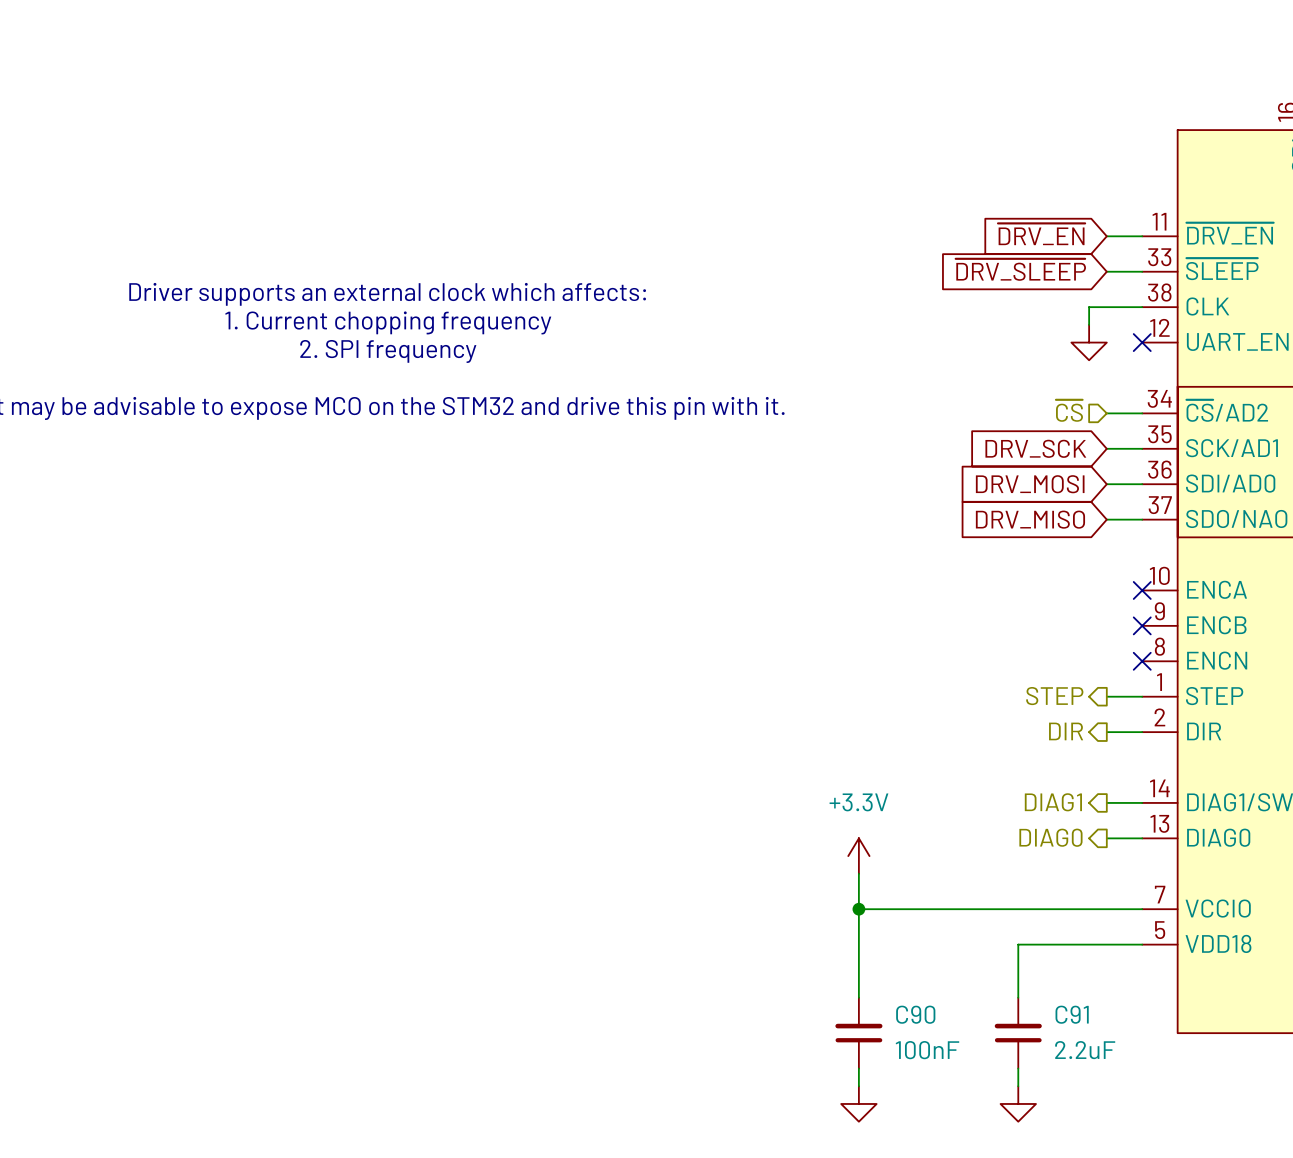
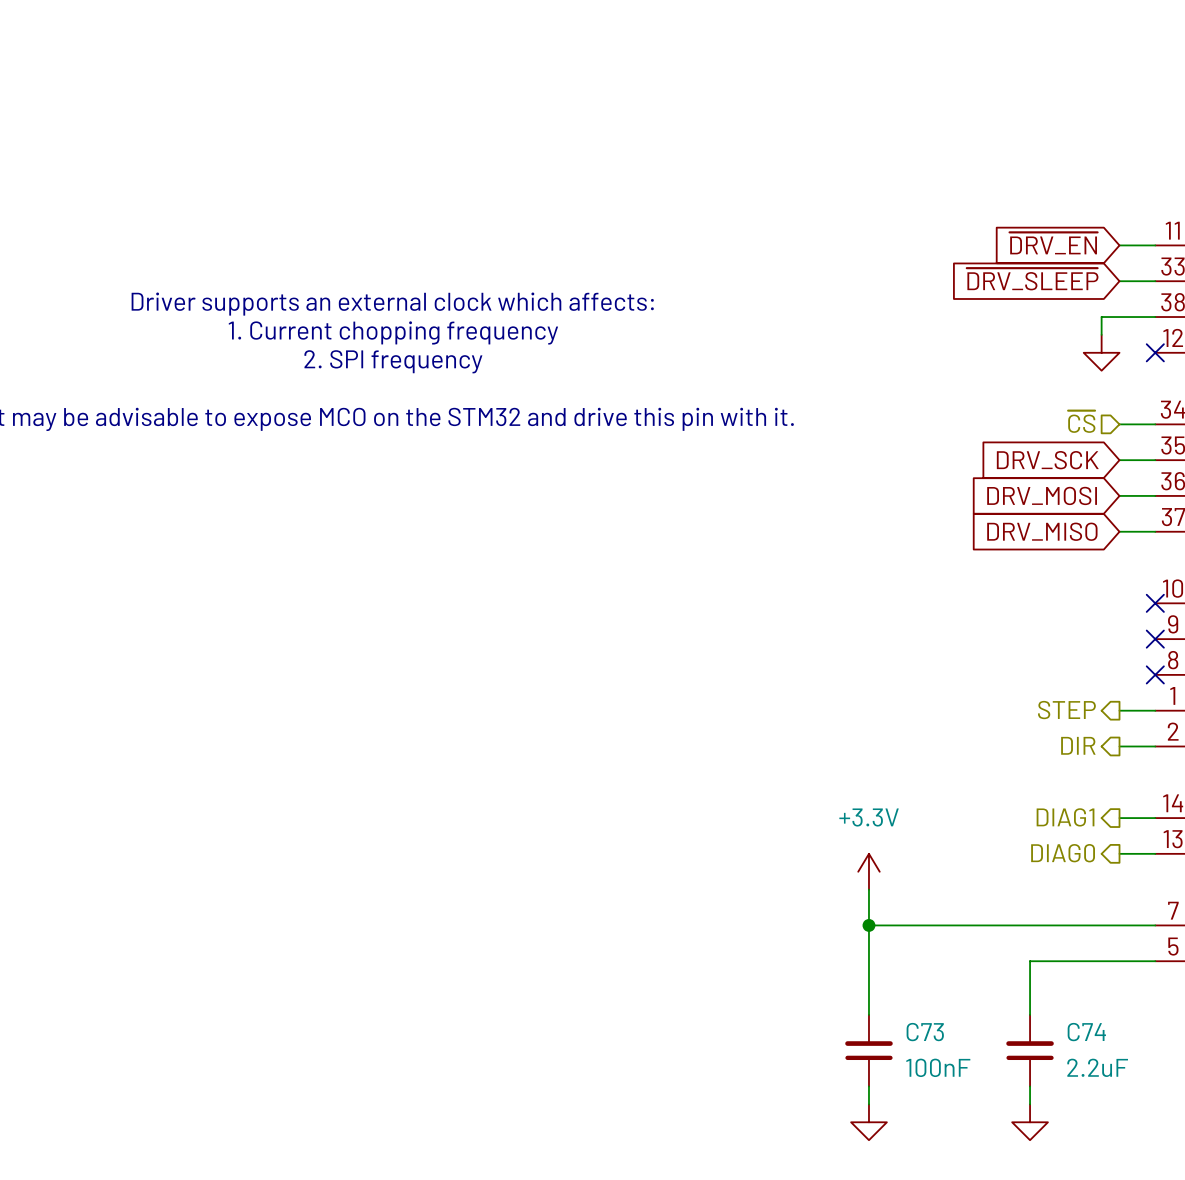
C90 name: C90 (915, 1014) -> C73 (925, 1032)
C91 name: C91 (1072, 1014) -> C74 (1086, 1032)

